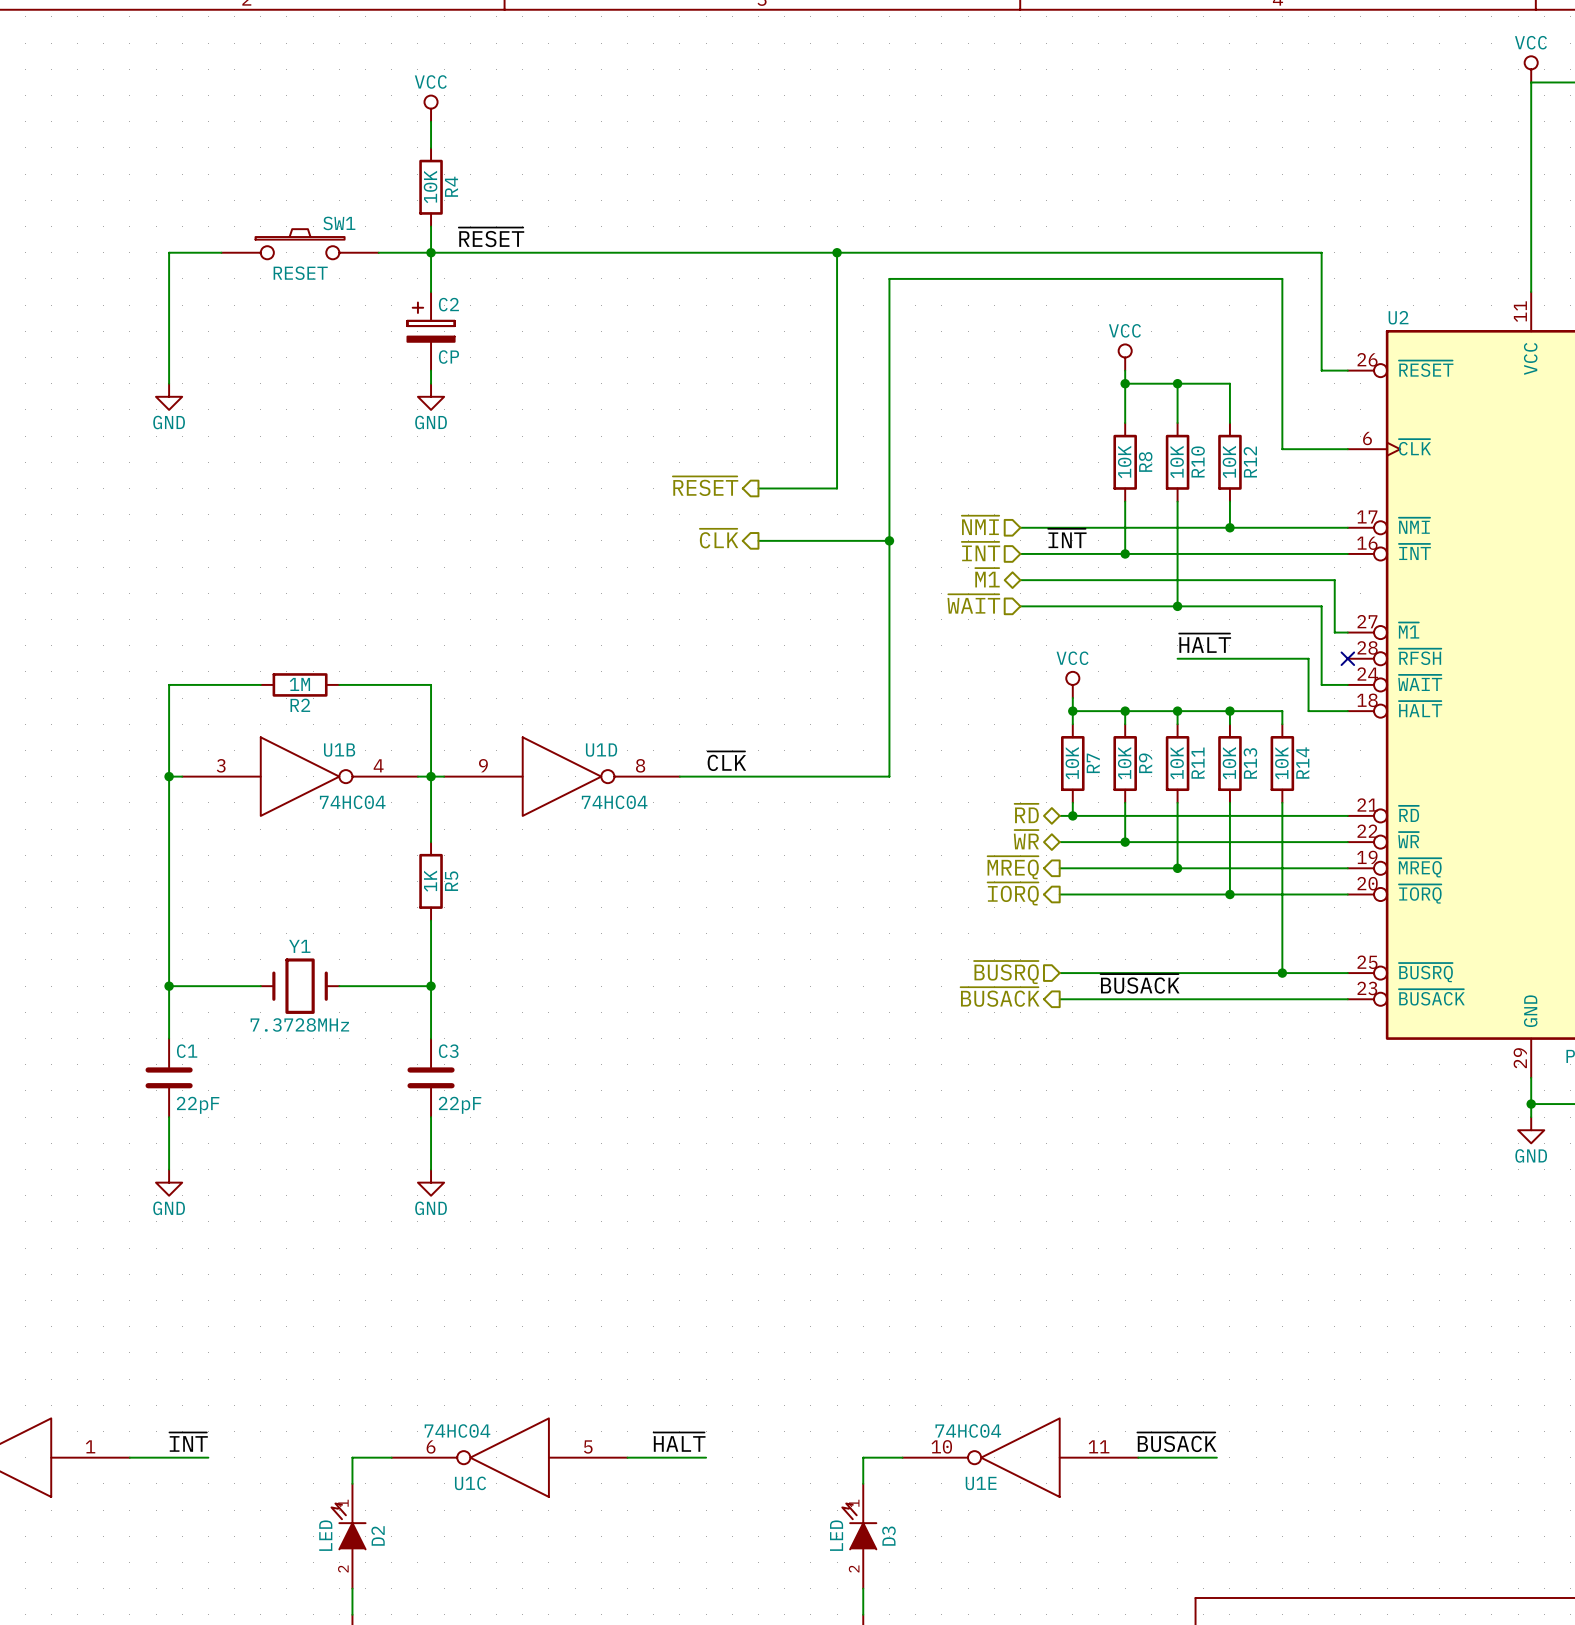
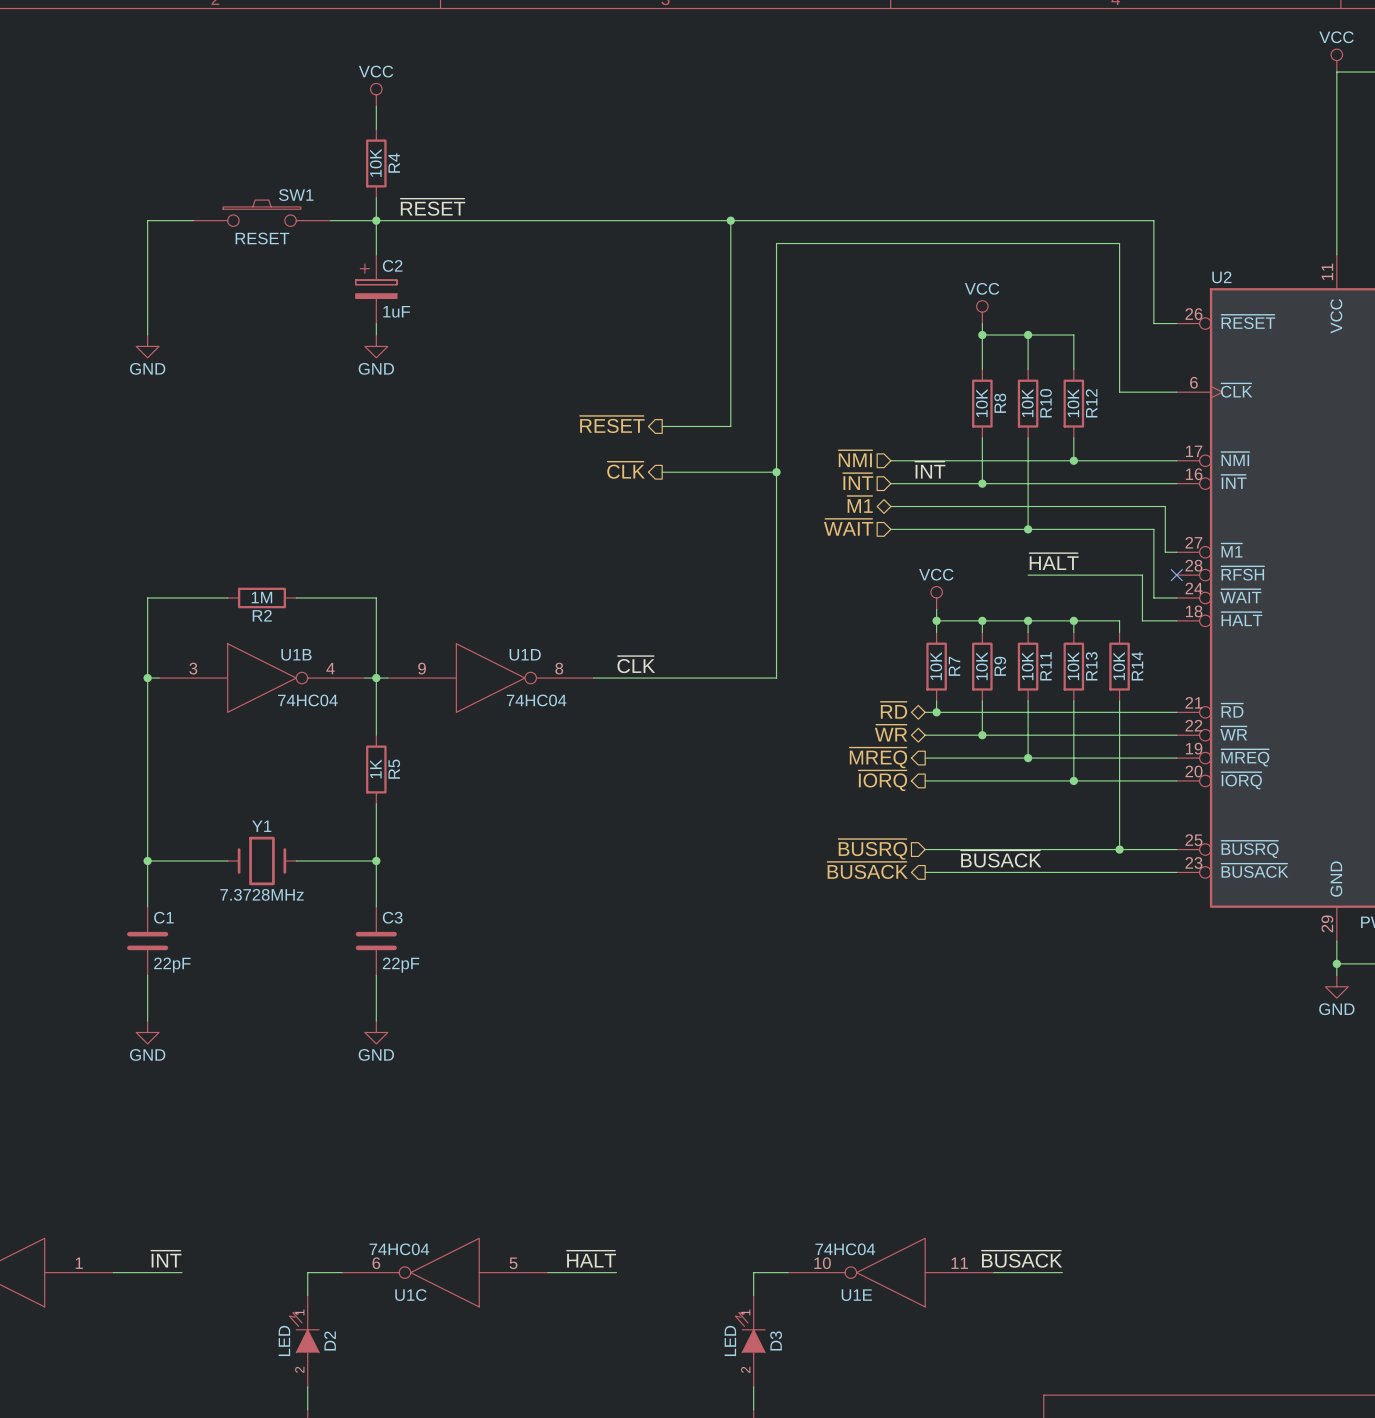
C2 value: CP (448, 357) -> 1uF (396, 311)

